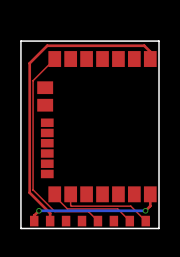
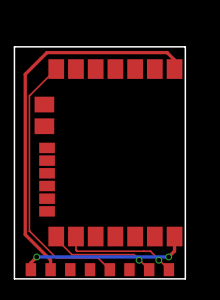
via: none -> (139, 260)
via: none -> (158, 260)

